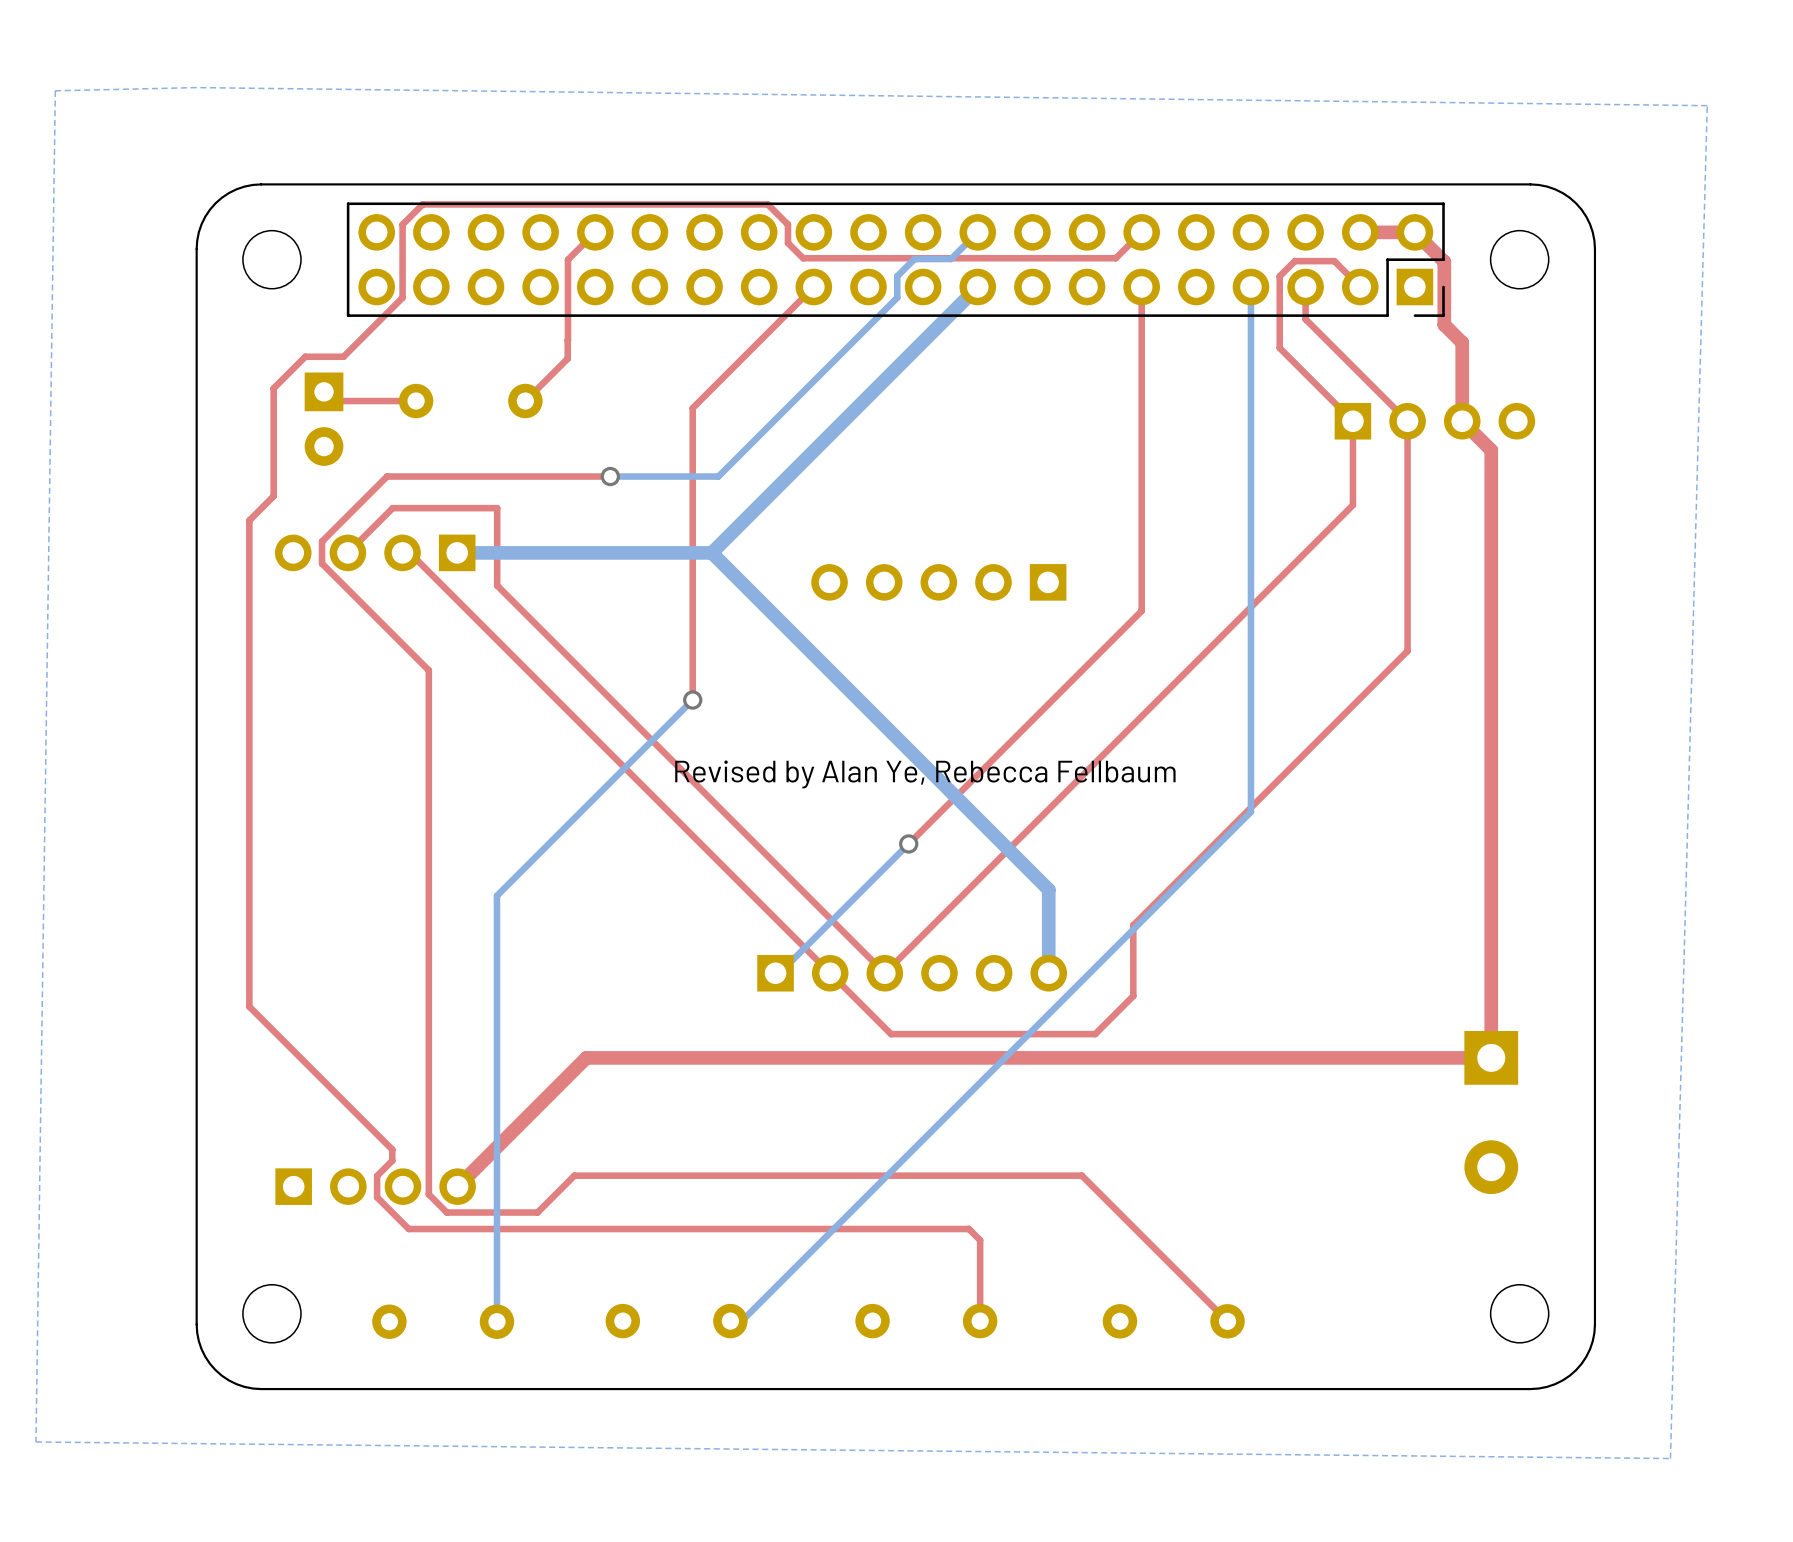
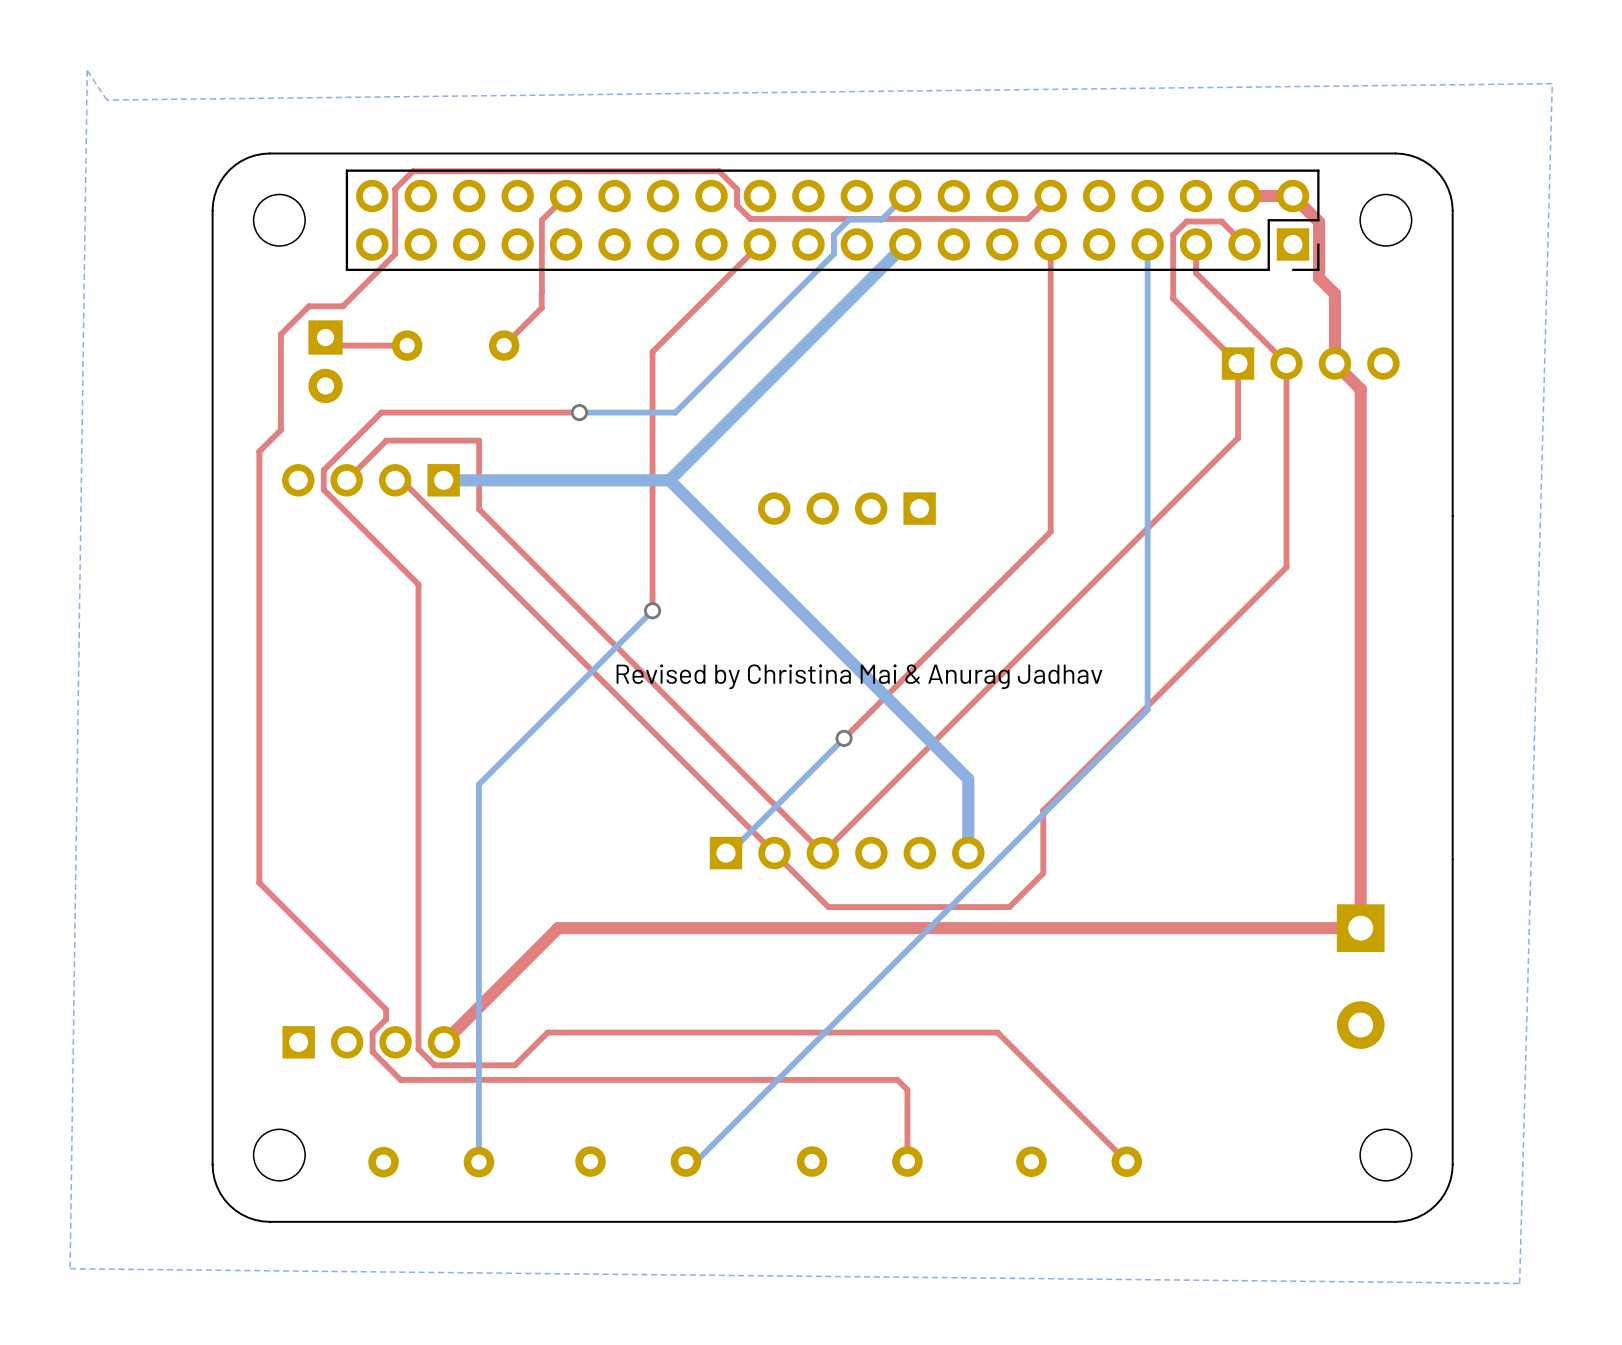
bottom zone outline: (55, 90) (196, 87) (1707, 105) -> (87, 70) (106, 100) (1552, 83)
part: (938, 582) -> none
part: none -> (846, 508)
text: Revised by Alan Ye, Rebecca Fellbaum (925, 774) -> Revised by Christina Mai & Anurag Jadhav (859, 676)

